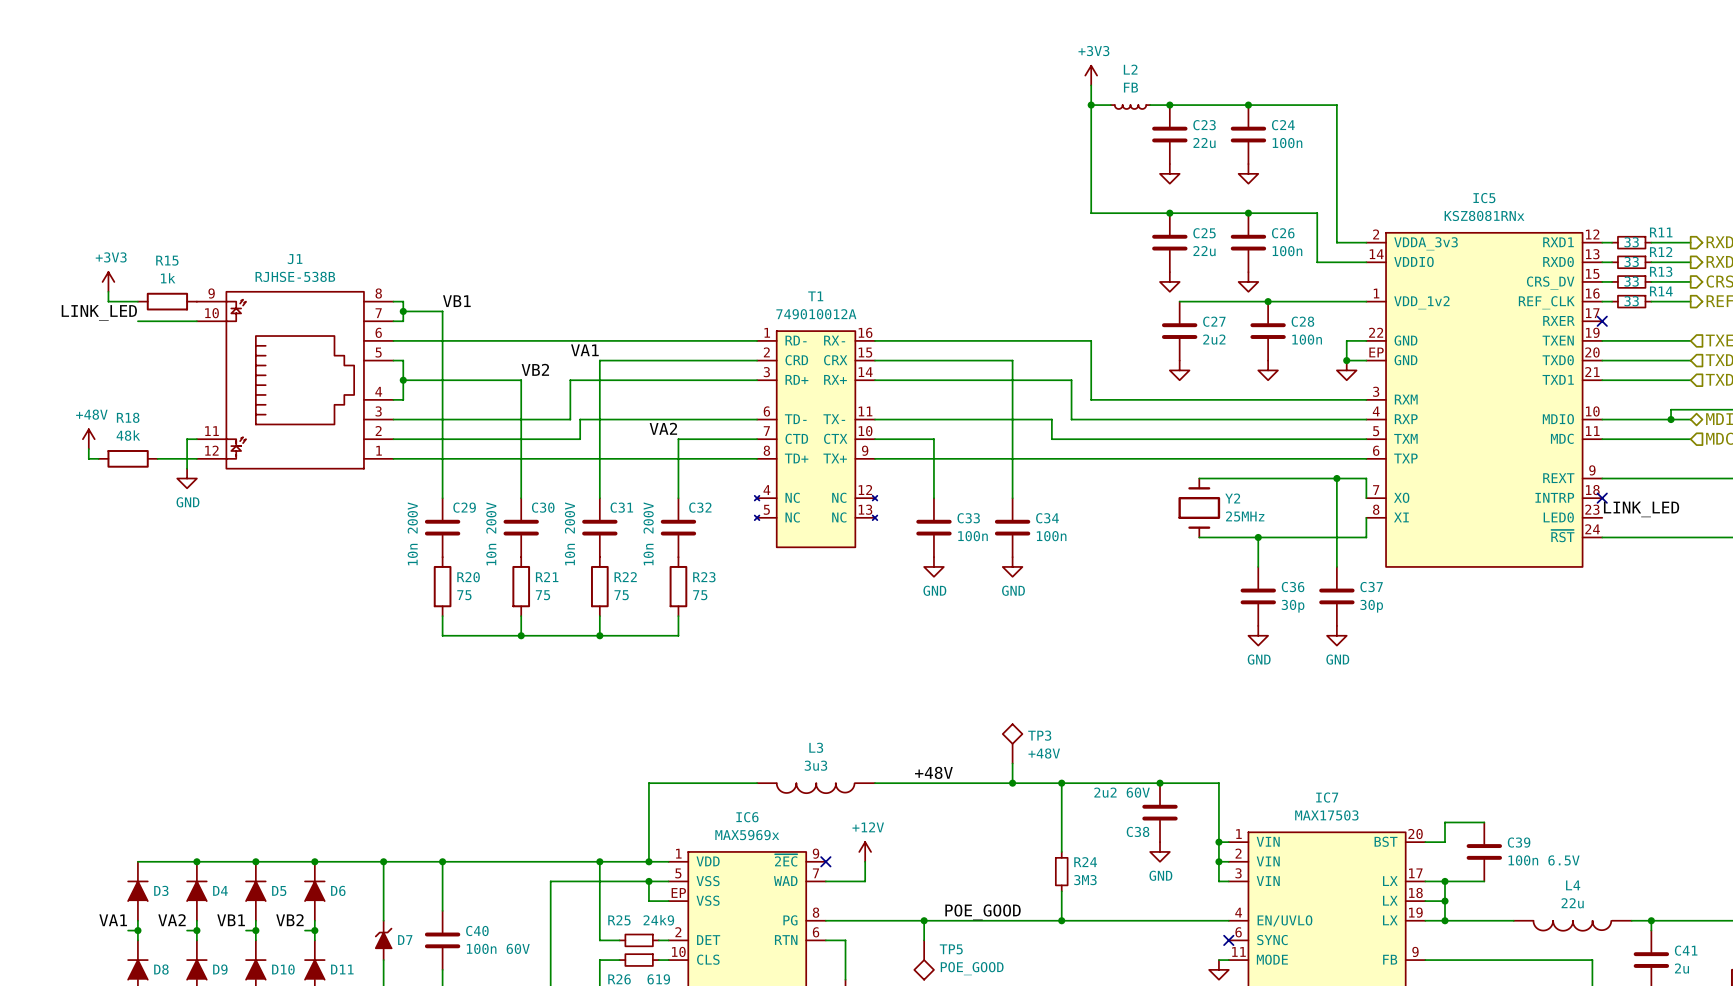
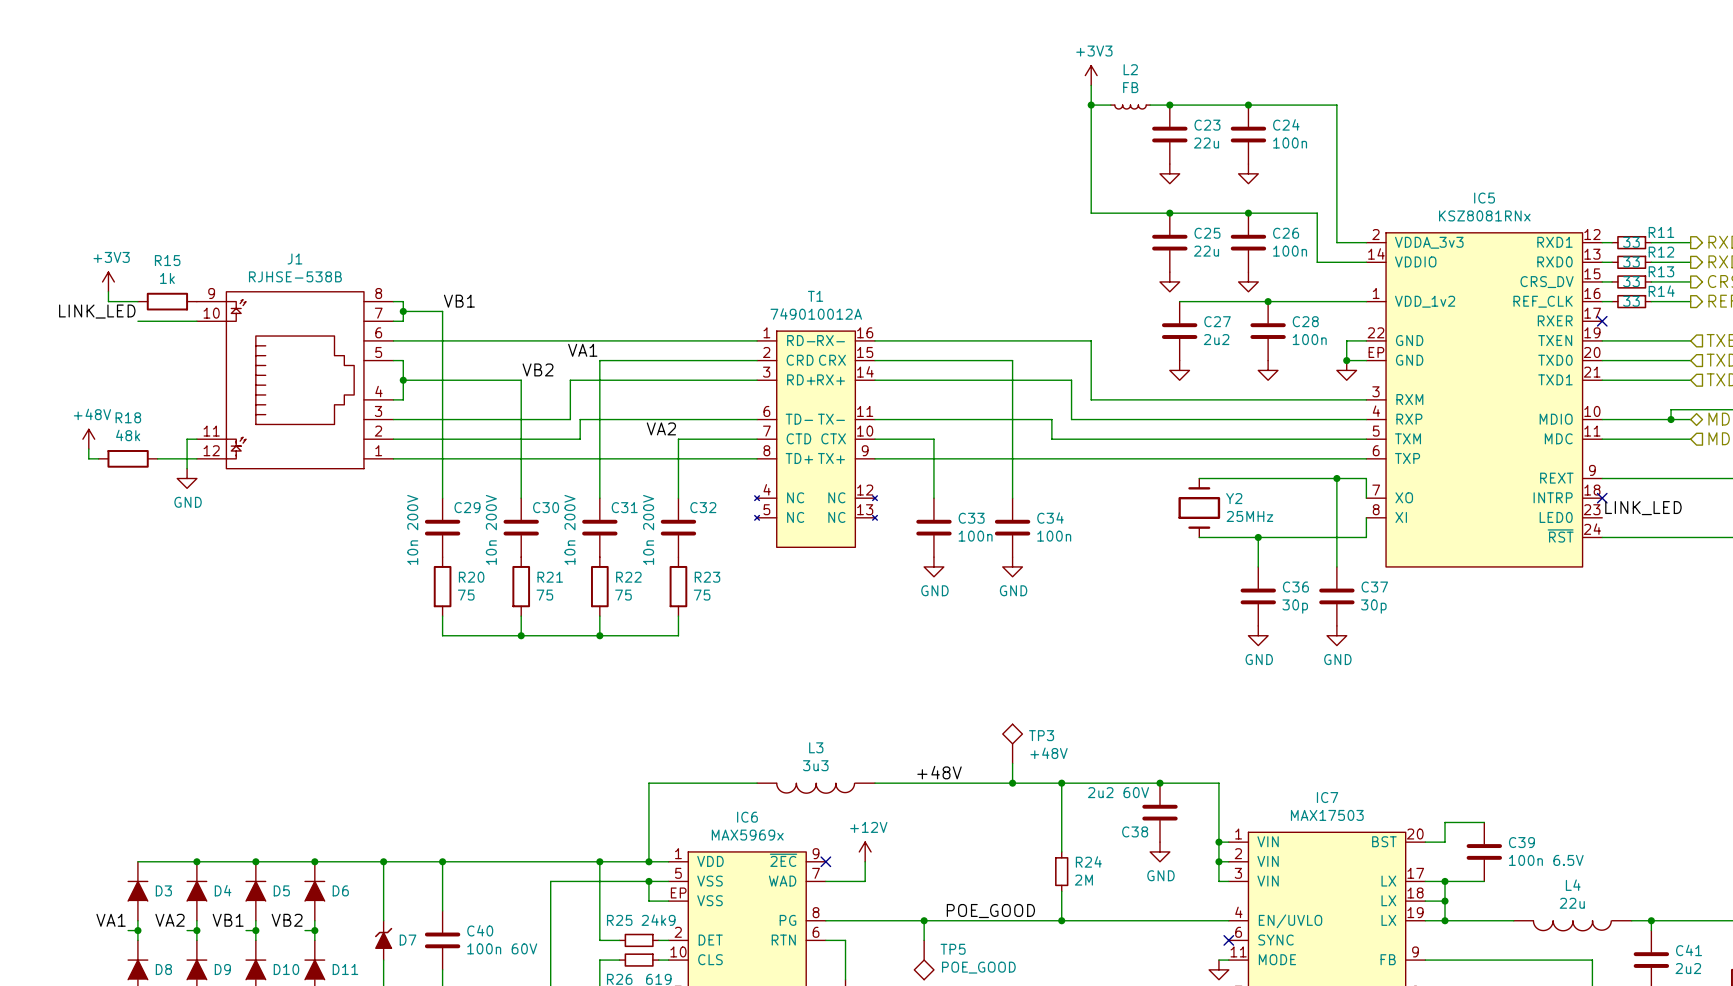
R24 value: 3M3 (1085, 880) -> 2M (1083, 880)
C41 value: 2u (1681, 968) -> 2u2 (1688, 968)

